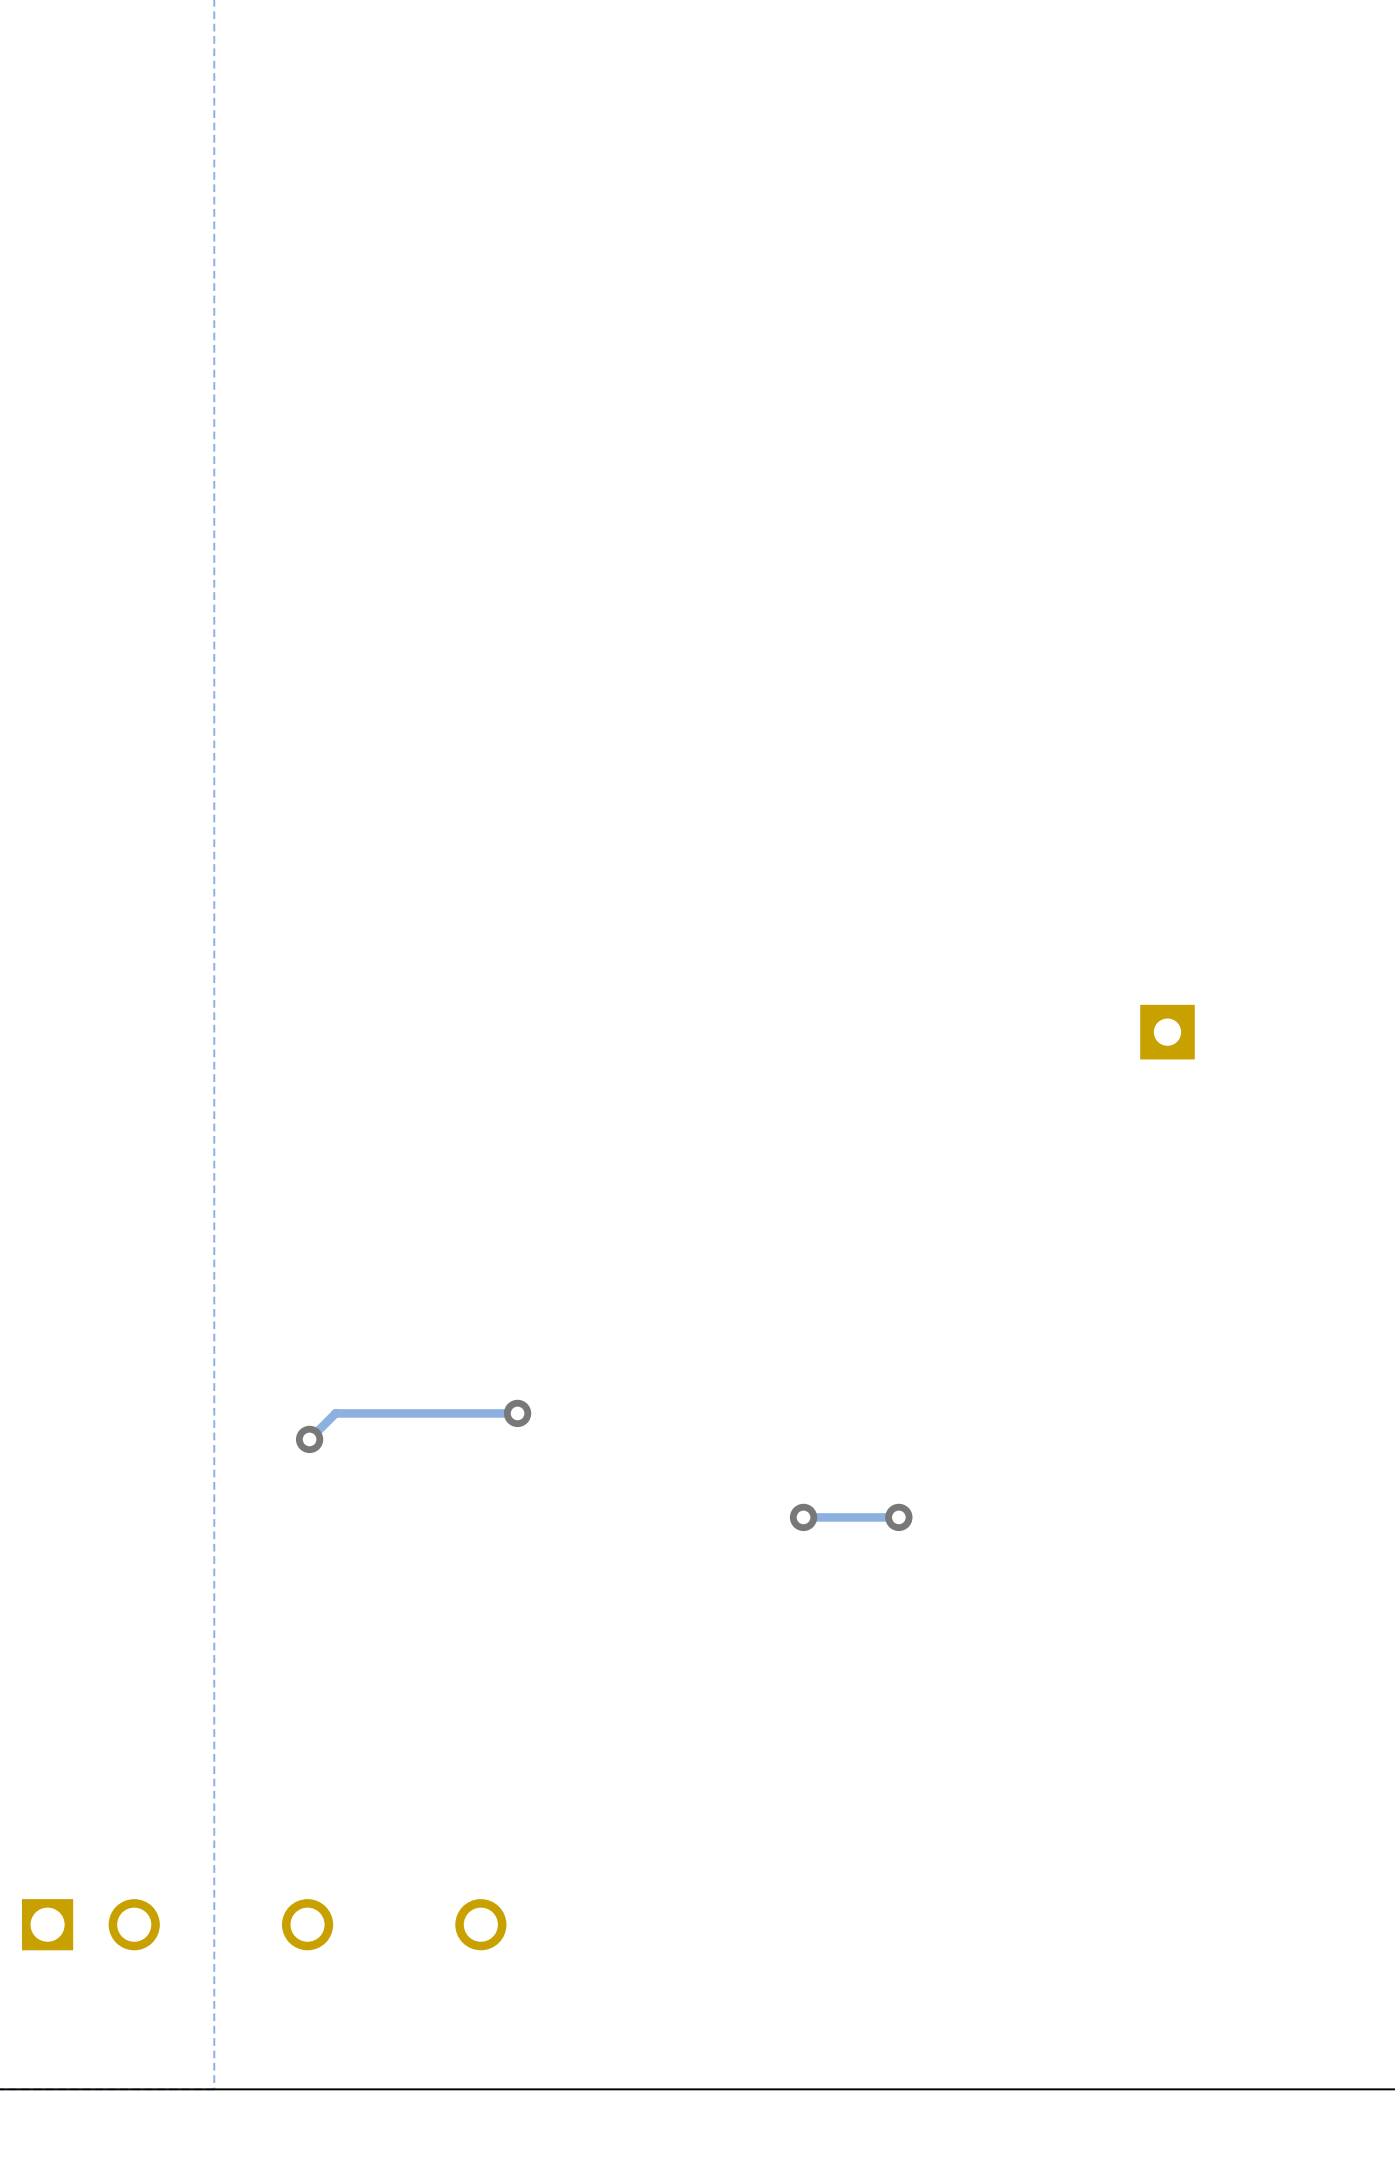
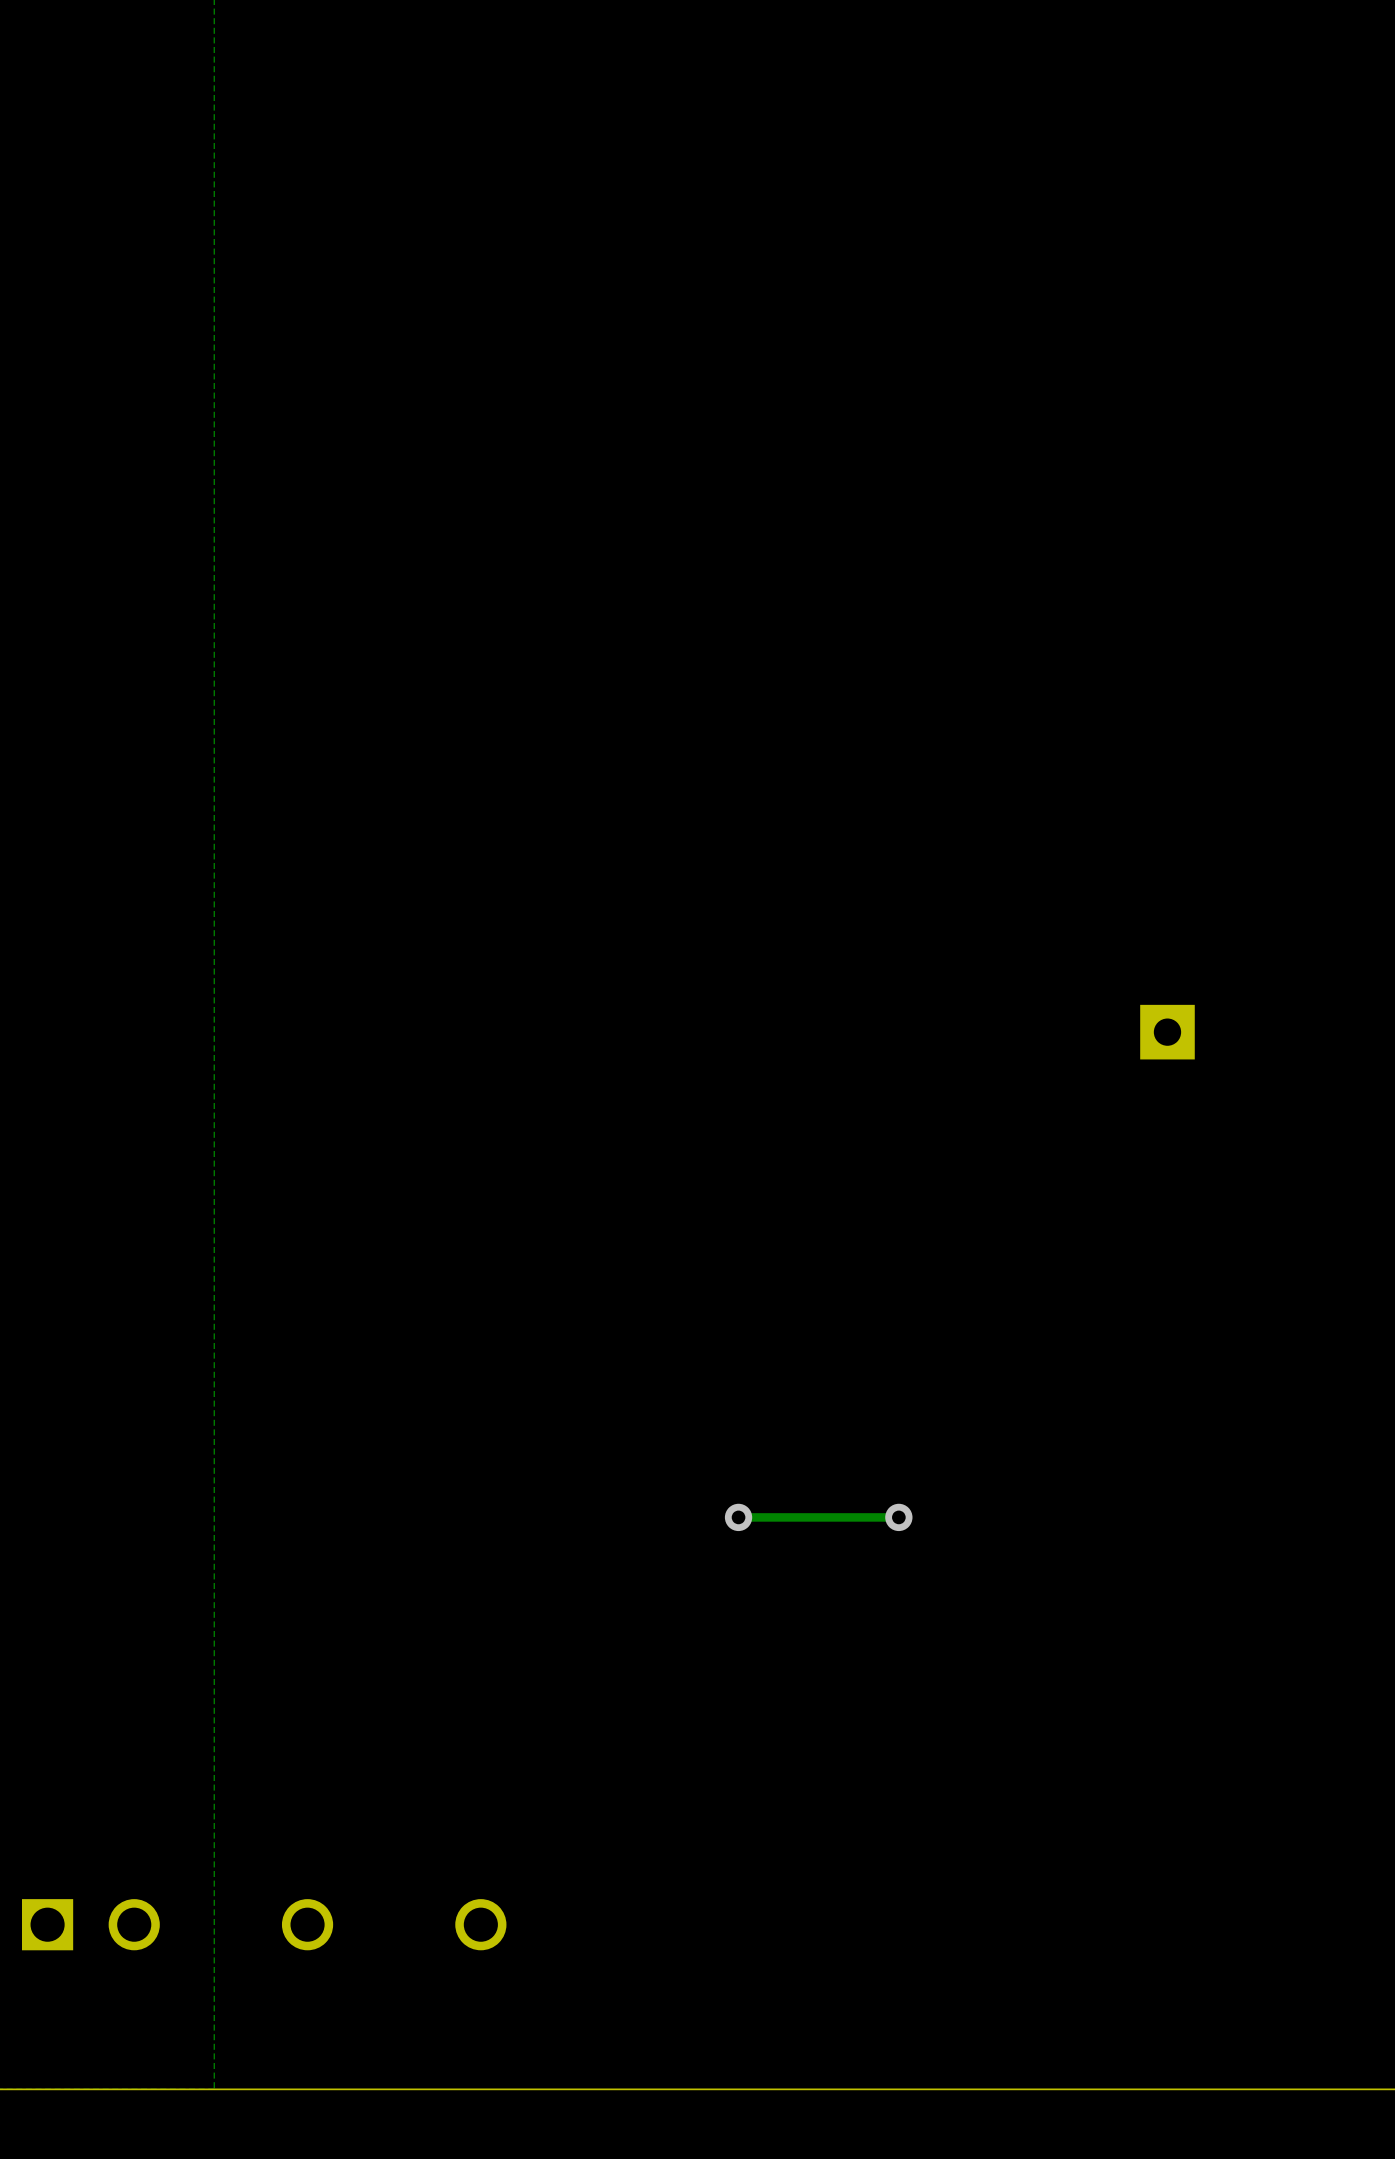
track: (517, 1413) (335, 1413) (309, 1439) -> none
via: (517, 1413) -> none
via: (309, 1439) -> none
track: none -> (803, 1517) (738, 1517)
via position: (803, 1517) -> (738, 1517)

